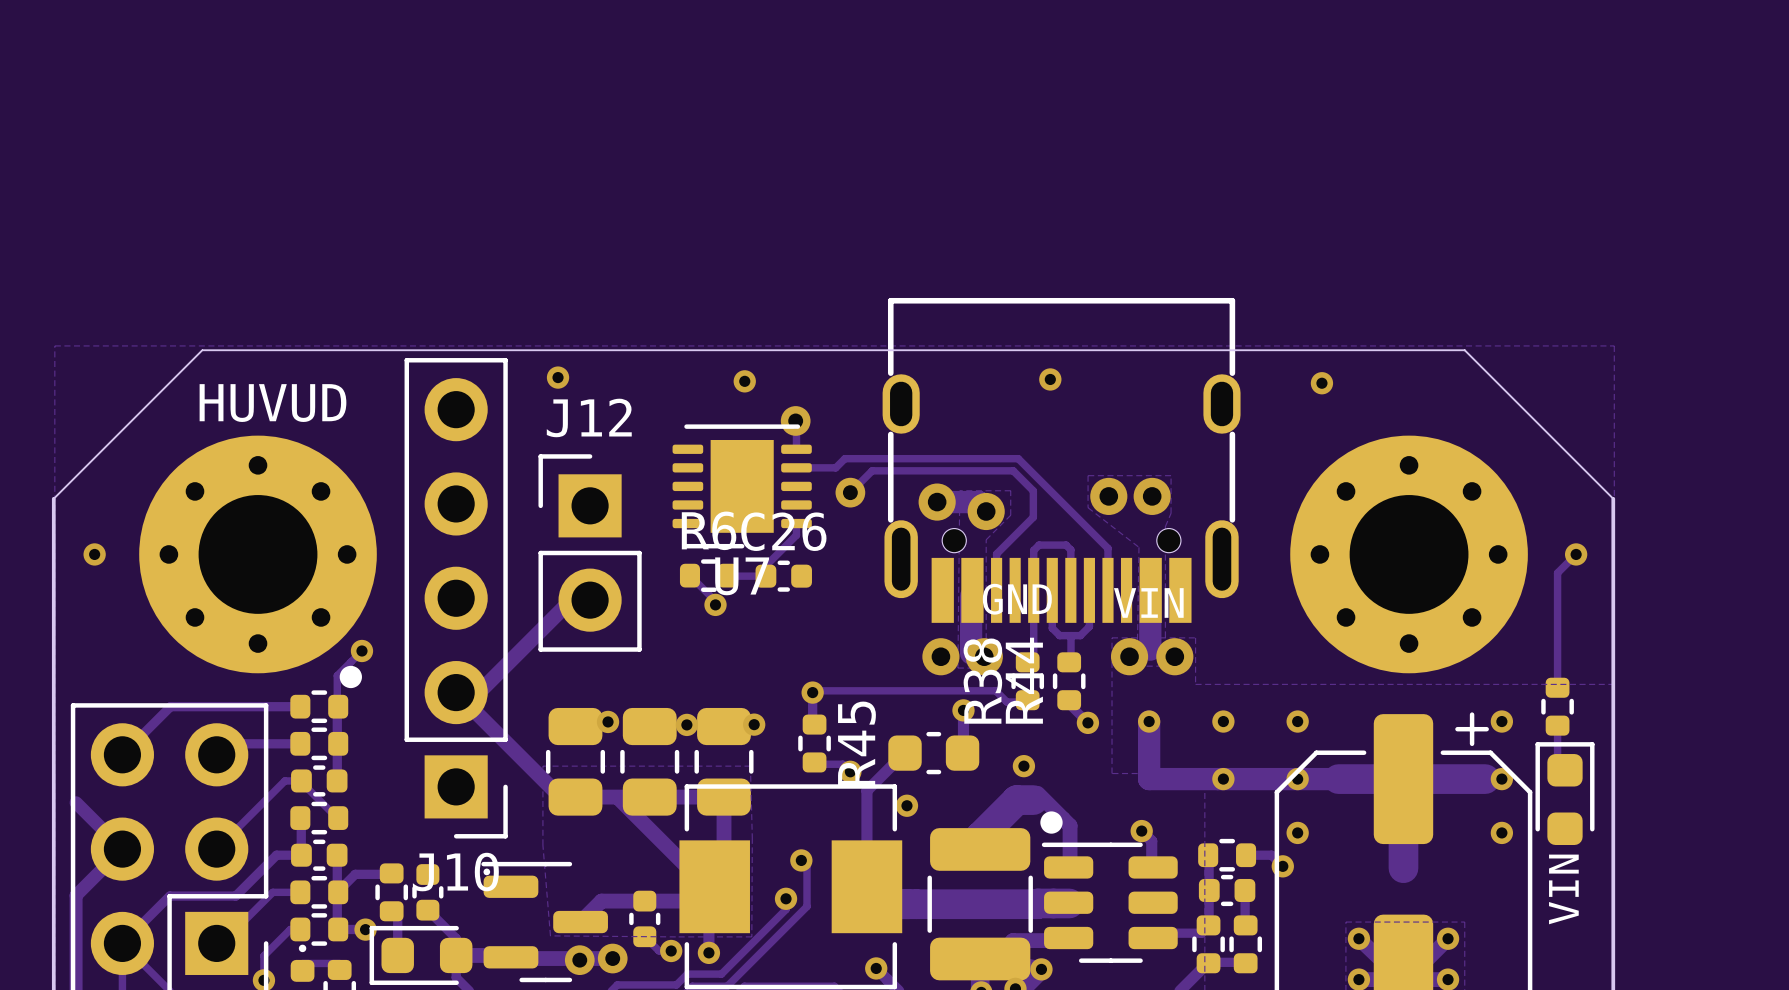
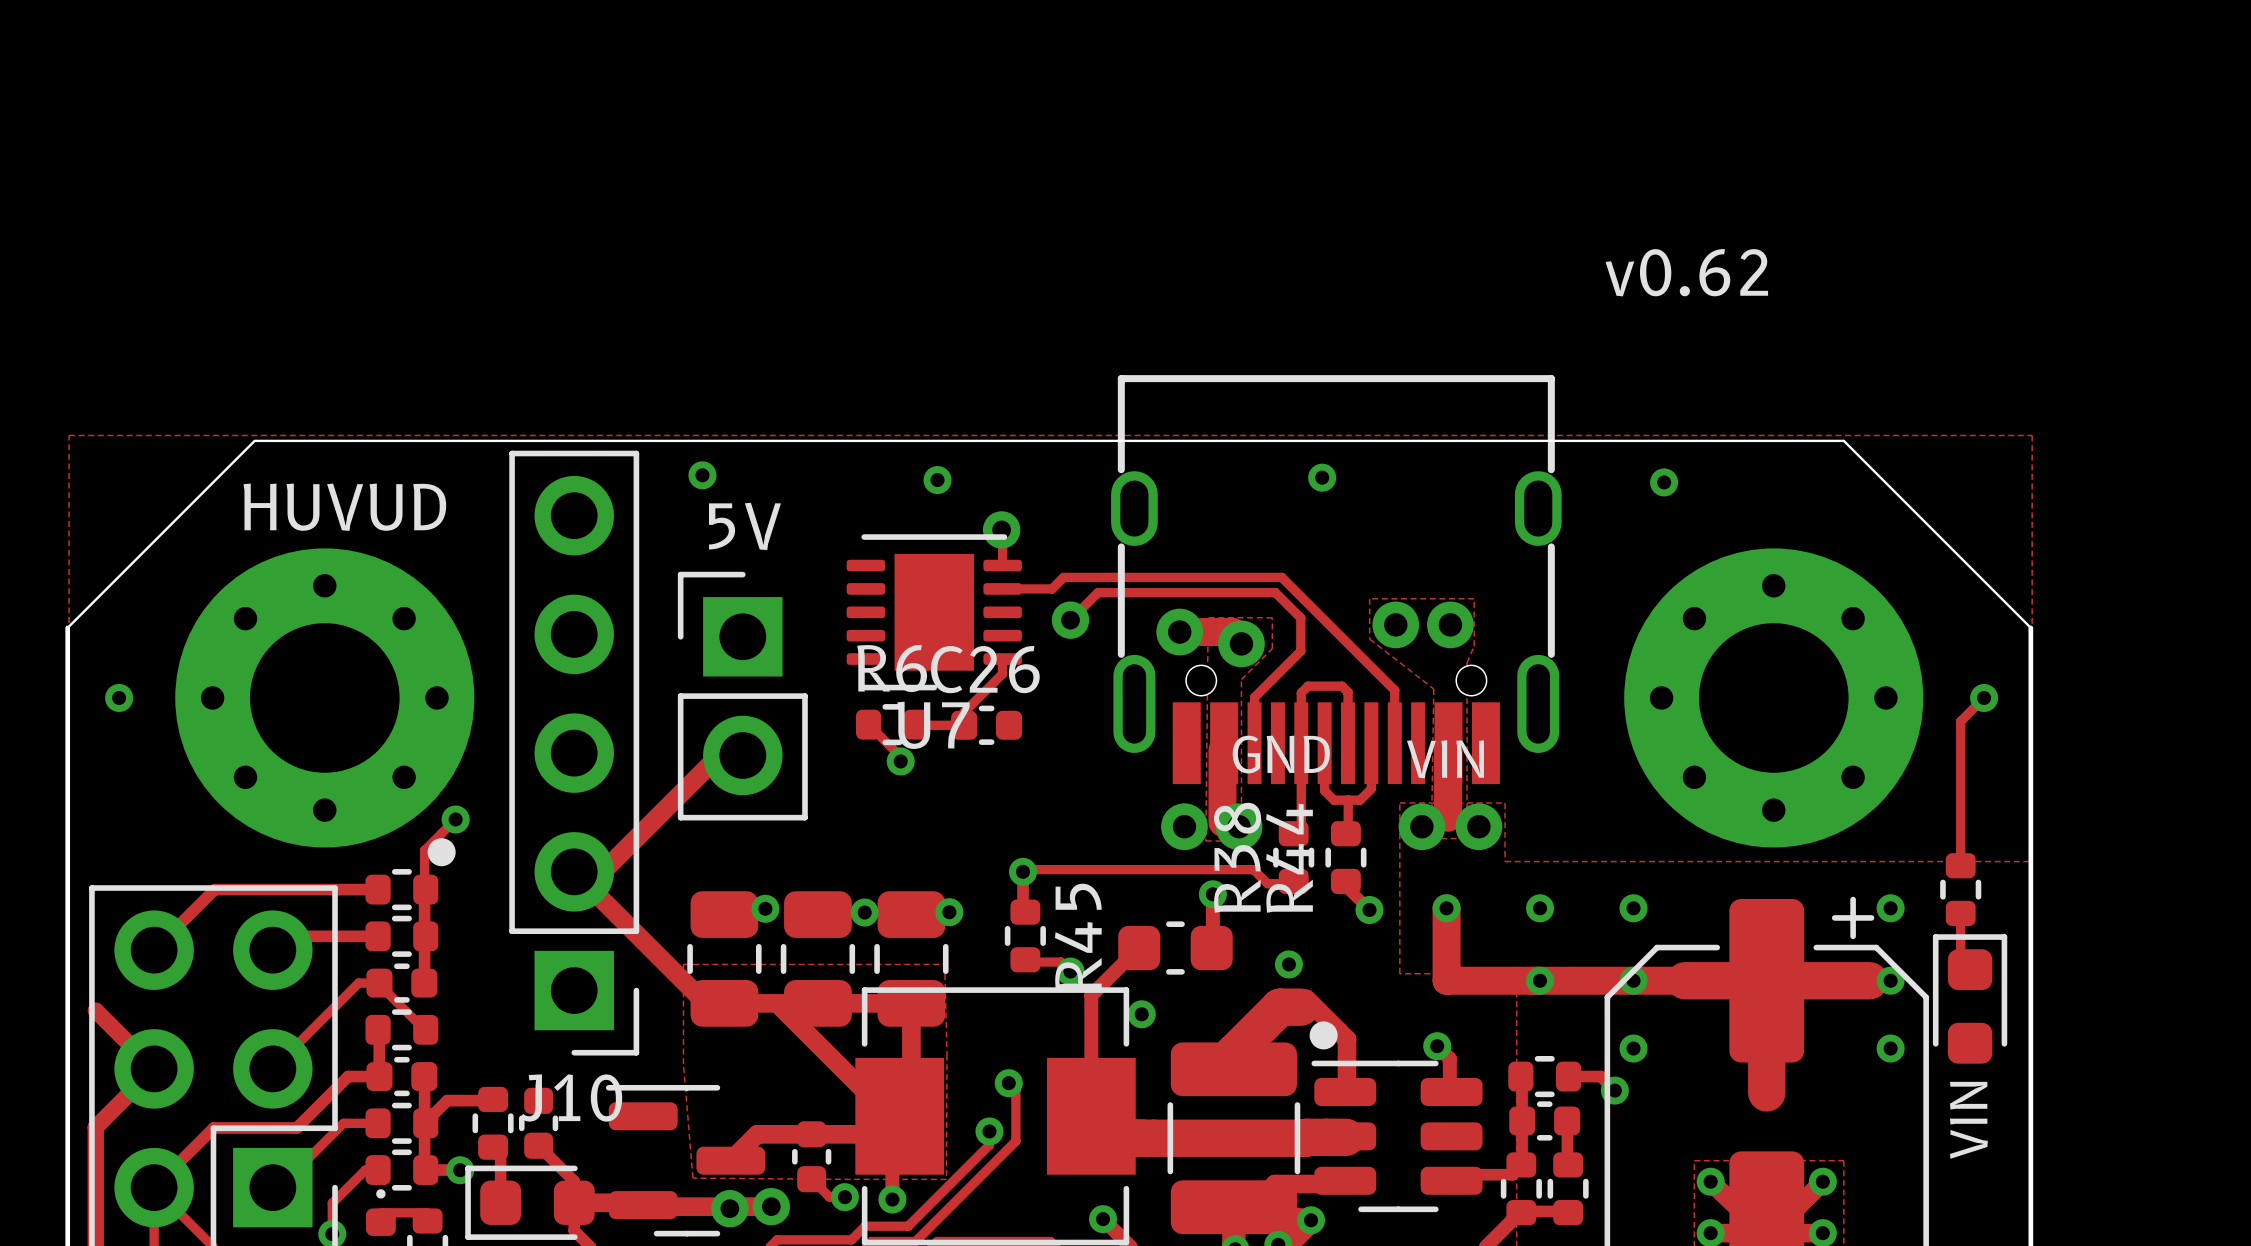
text: none -> v0.62 (1686, 272)
J12 name: J12 (589, 417) -> 5V (744, 526)

